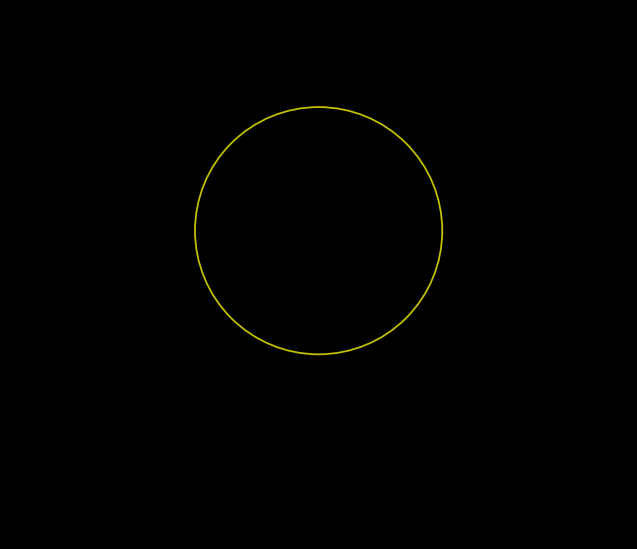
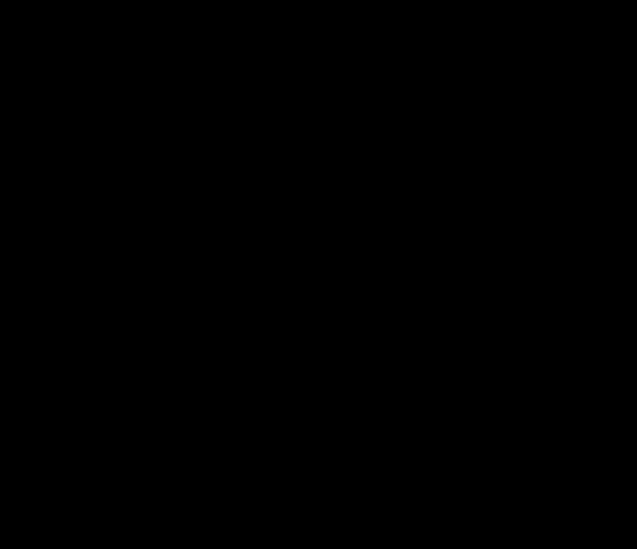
round board edge: [194, 106, 444, 356] -> none

